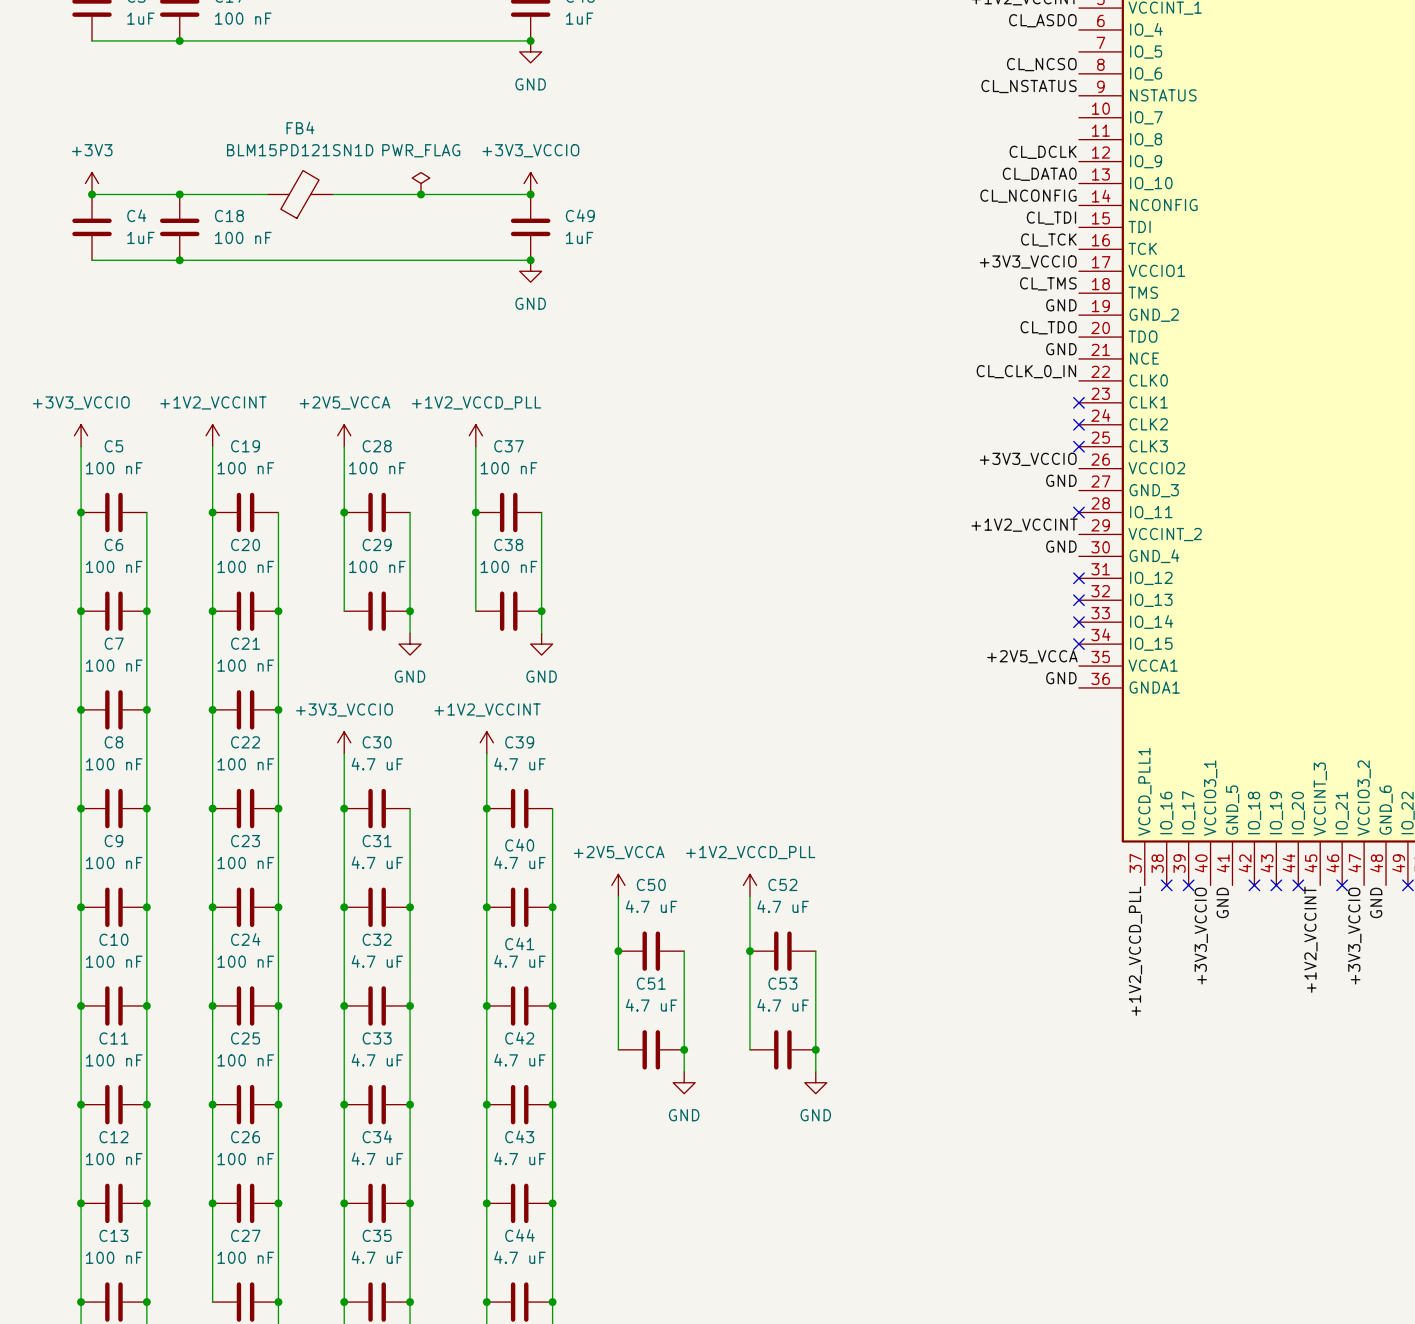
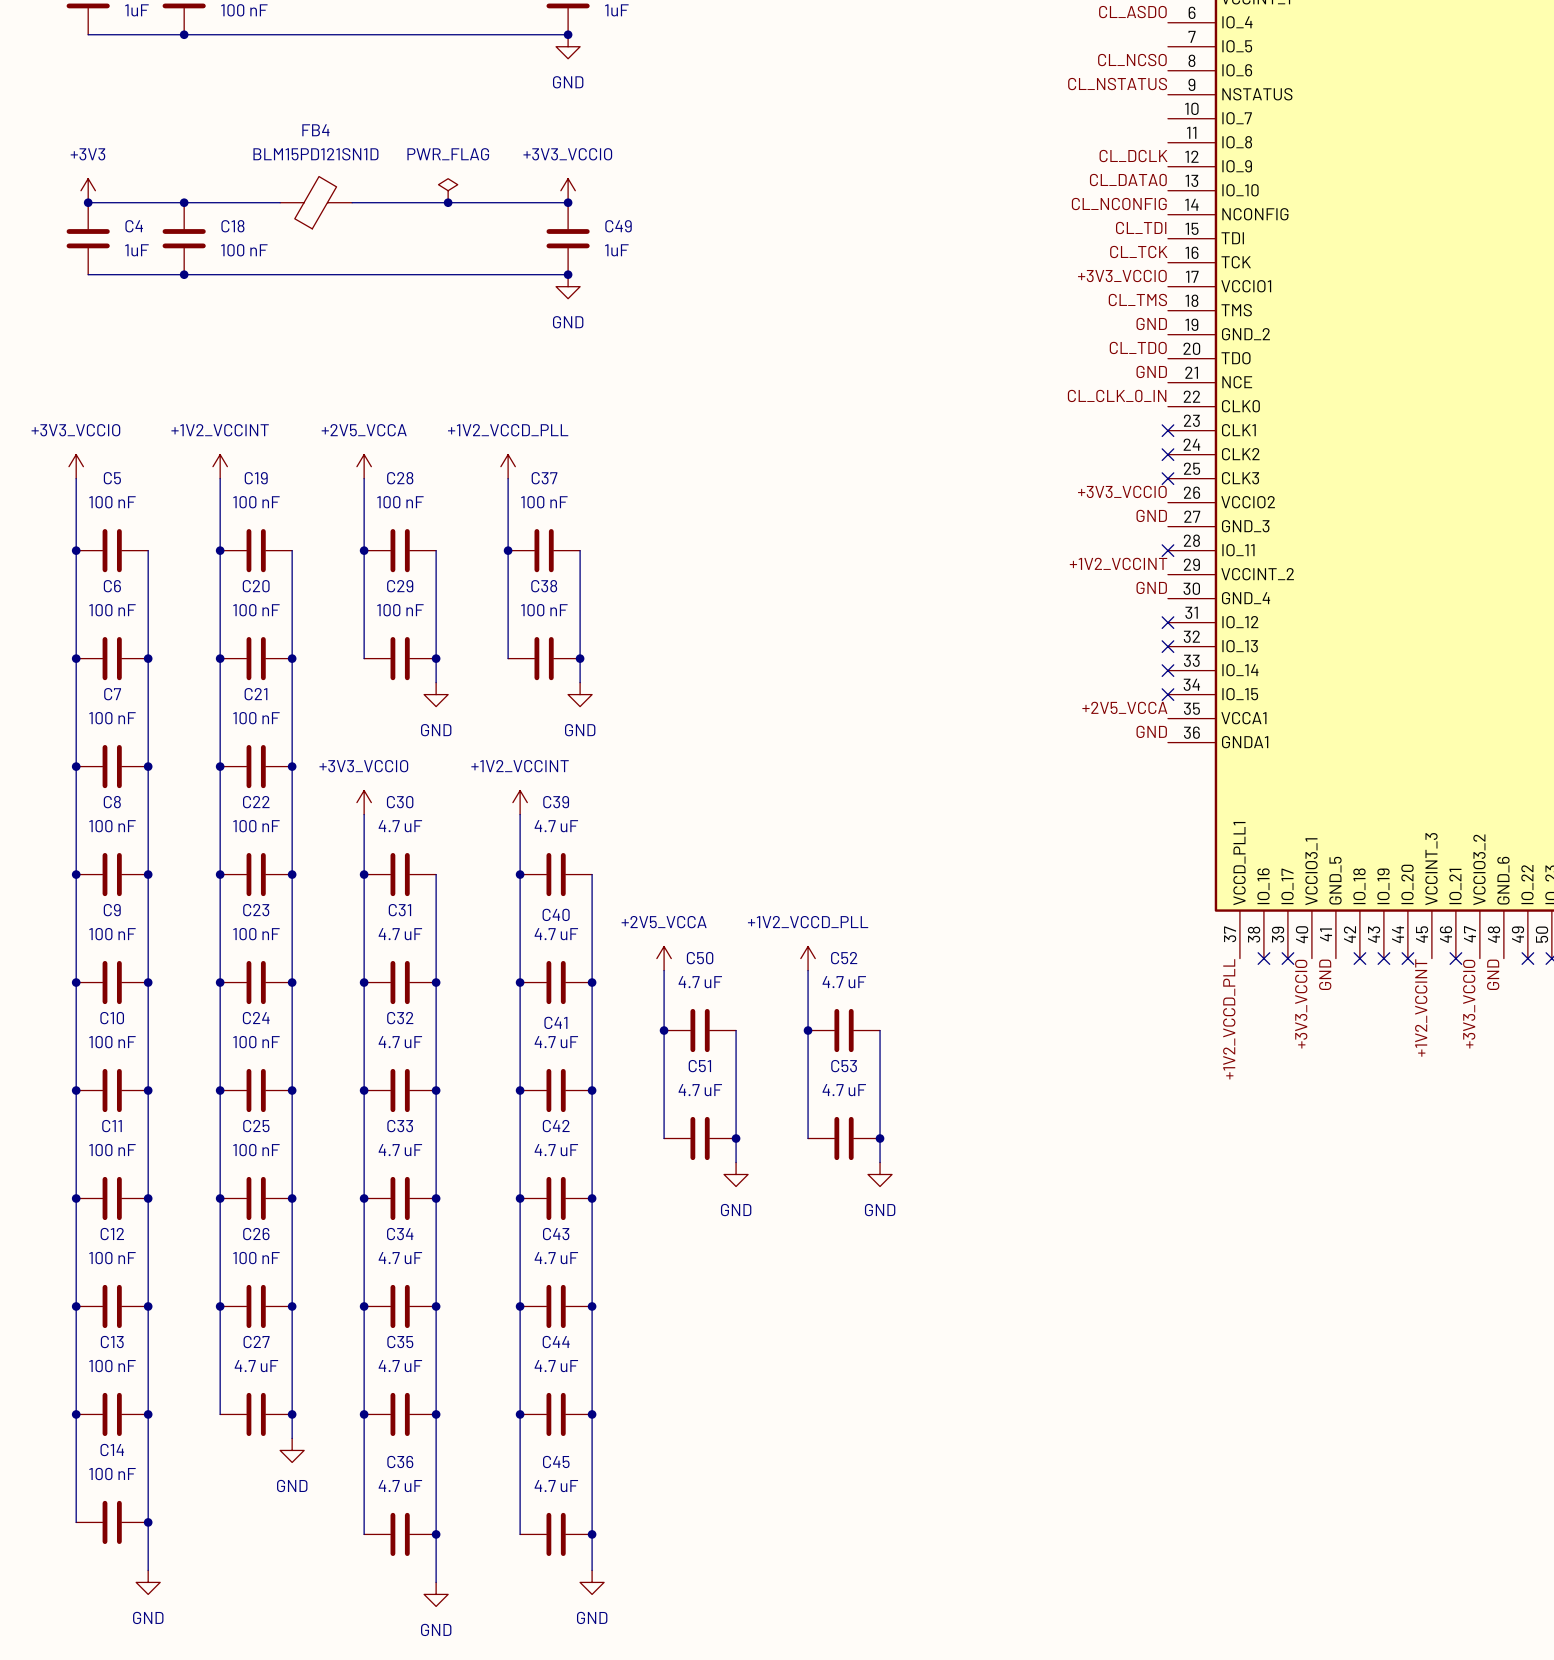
C27 value: 100 nF (245, 1257) -> 4.7 uF (256, 1366)

